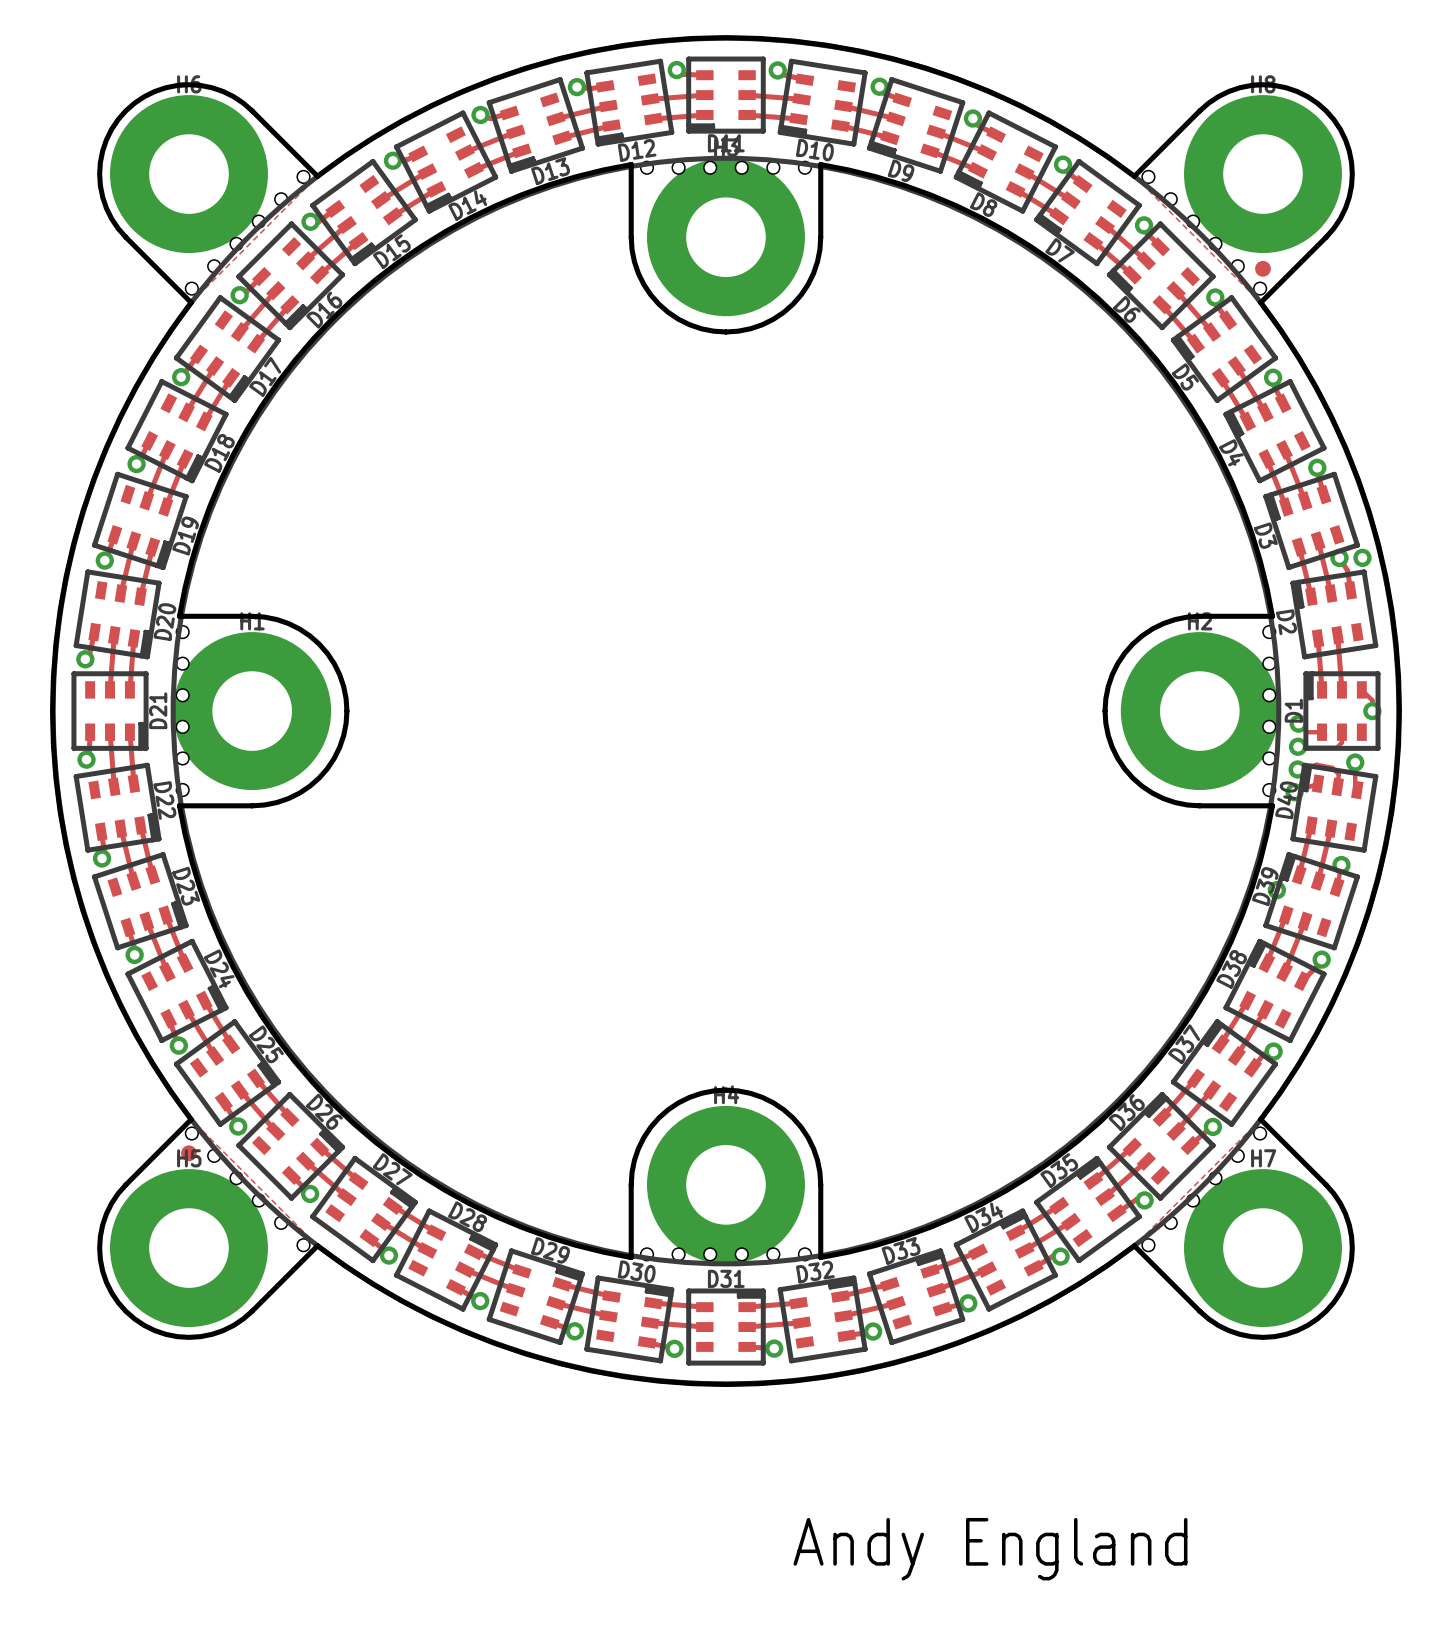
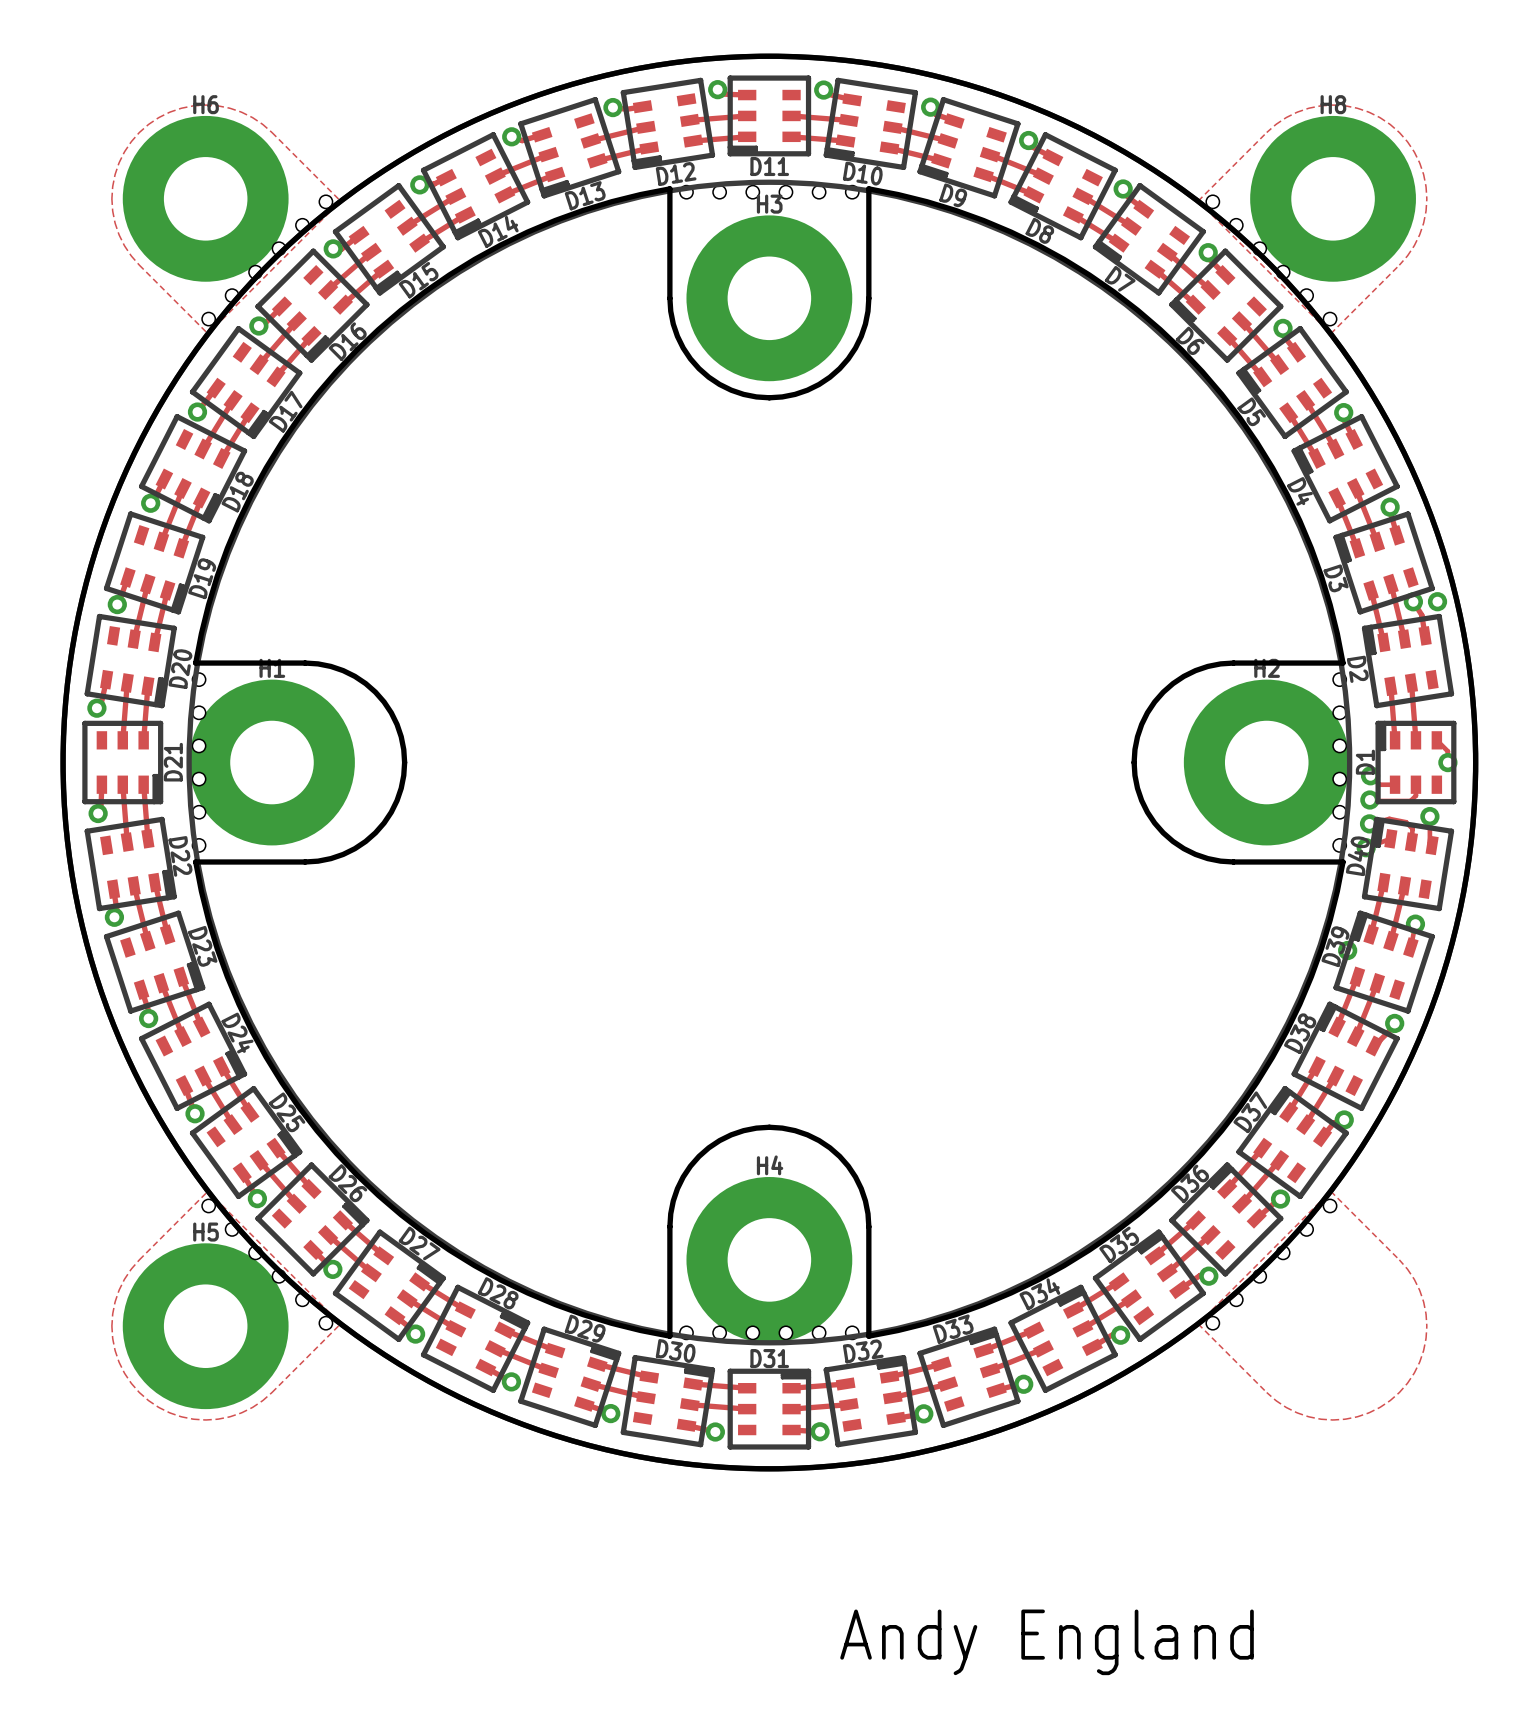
round board edge: none -> [60, 53, 1479, 1472]
board edge: (252, 110) (317, 176) (344, 156) (402, 120) (432, 105) (494, 78) (558, 58) (591, 51) (658, 41) (725, 37) (793, 41) (860, 51) (893, 58) (957, 78) (1019, 105) (1049, 120) (1107, 156) (1134, 176) (1199, 110) (1218, 96) (1228, 91) (1251, 85) (1274, 85) (1297, 91) (1307, 96) (1326, 110) (1340, 129) (1345, 139) (1351, 162) (1351, 185) (1345, 208) (1340, 218) (1326, 237) (1260, 302) (1280, 329) (1316, 387) (1331, 417) (1358, 479) (1378, 543) (1385, 576) (1396, 643) (1399, 711) (1396, 778) (1385, 845) (1378, 878) (1358, 942) (1331, 1004) (1316, 1034) (1280, 1092) (1260, 1119) (1326, 1184) (1340, 1203) (1345, 1213) (1351, 1236) (1351, 1259) (1345, 1282) (1340, 1292) (1326, 1311) (1307, 1325) (1297, 1330) (1274, 1336) (1251, 1336) (1228, 1330) (1218, 1325) (1199, 1311) (1134, 1245) (1107, 1265) (1049, 1301) (1019, 1316) (957, 1343) (893, 1363) (860, 1370) (793, 1381) (725, 1384) (658, 1381) (591, 1370) (558, 1363) (494, 1343) (432, 1316) (402, 1301) (344, 1265) (317, 1245) (252, 1311) (233, 1325) (223, 1330) (200, 1336) (177, 1336) (154, 1330) (144, 1325) (125, 1311) (111, 1292) (106, 1282) (100, 1259) (100, 1236) (106, 1213) (111, 1203) (125, 1184) (191, 1119) (171, 1092) (135, 1034) (106, 974) (82, 910) (66, 845) (55, 778) (52, 711) (53, 677) (55, 643) (66, 576) (73, 543) (93, 479) (120, 417) (135, 387) (171, 329) (191, 302) (125, 237) (111, 218) (106, 208) (100, 185) (100, 162) (106, 139) (118, 119) (134, 103) (154, 91) (177, 85) (200, 85) (223, 91) (233, 96) (252, 110) -> none
board edge: (631, 237) (634, 261) (638, 273) (643, 284) (658, 304) (678, 319) (689, 324) (701, 328) (725, 332) (750, 328) (762, 324) (773, 319) (792, 304) (808, 284) (813, 273) (817, 261) (820, 237) -> (669, 265) (669, 298) (673, 324) (683, 348) (690, 358) (699, 368) (719, 384) (743, 394) (769, 397) (795, 394) (819, 384) (839, 368) (848, 358) (855, 348) (865, 324) (868, 298) (868, 265)
H3 position: (725, 237) -> (769, 298)
part: (1262, 268) -> none
board edge: (252, 616) (276, 619) (288, 623) (299, 628) (319, 644) (334, 663) (339, 674) (343, 686) (346, 711) (343, 735) (339, 747) (334, 758) (319, 778) (299, 793) (288, 798) (276, 802) (252, 805) -> (271, 663) (305, 663) (330, 666) (354, 676) (365, 683) (375, 692) (391, 712) (401, 736) (404, 762) (401, 788) (391, 812) (375, 832) (365, 841) (354, 848) (330, 858) (305, 862) (271, 862)
board edge: (1199, 616) (1175, 619) (1163, 623) (1152, 628) (1132, 644) (1117, 663) (1112, 674) (1108, 686) (1105, 711) (1108, 735) (1112, 747) (1117, 758) (1132, 778) (1152, 793) (1163, 798) (1175, 802) (1199, 805) -> (1266, 663) (1233, 663) (1207, 666) (1183, 676) (1173, 683) (1163, 692) (1147, 712) (1137, 736) (1134, 762) (1137, 788) (1147, 812) (1163, 832) (1173, 841) (1183, 848) (1207, 858) (1233, 862) (1266, 862)
part: (188, 1153) -> none
board edge: (631, 1184) (634, 1160) (638, 1148) (643, 1137) (658, 1117) (678, 1102) (689, 1097) (701, 1093) (725, 1090) (750, 1093) (762, 1097) (773, 1102) (792, 1117) (808, 1137) (813, 1148) (817, 1160) (820, 1184) -> (669, 1259) (669, 1226) (673, 1201) (683, 1177) (690, 1166) (699, 1156) (719, 1140) (743, 1130) (769, 1127) (795, 1130) (819, 1140) (839, 1156) (848, 1166) (855, 1177) (865, 1201) (868, 1226) (868, 1259)
H7: (1262, 1248) -> none

